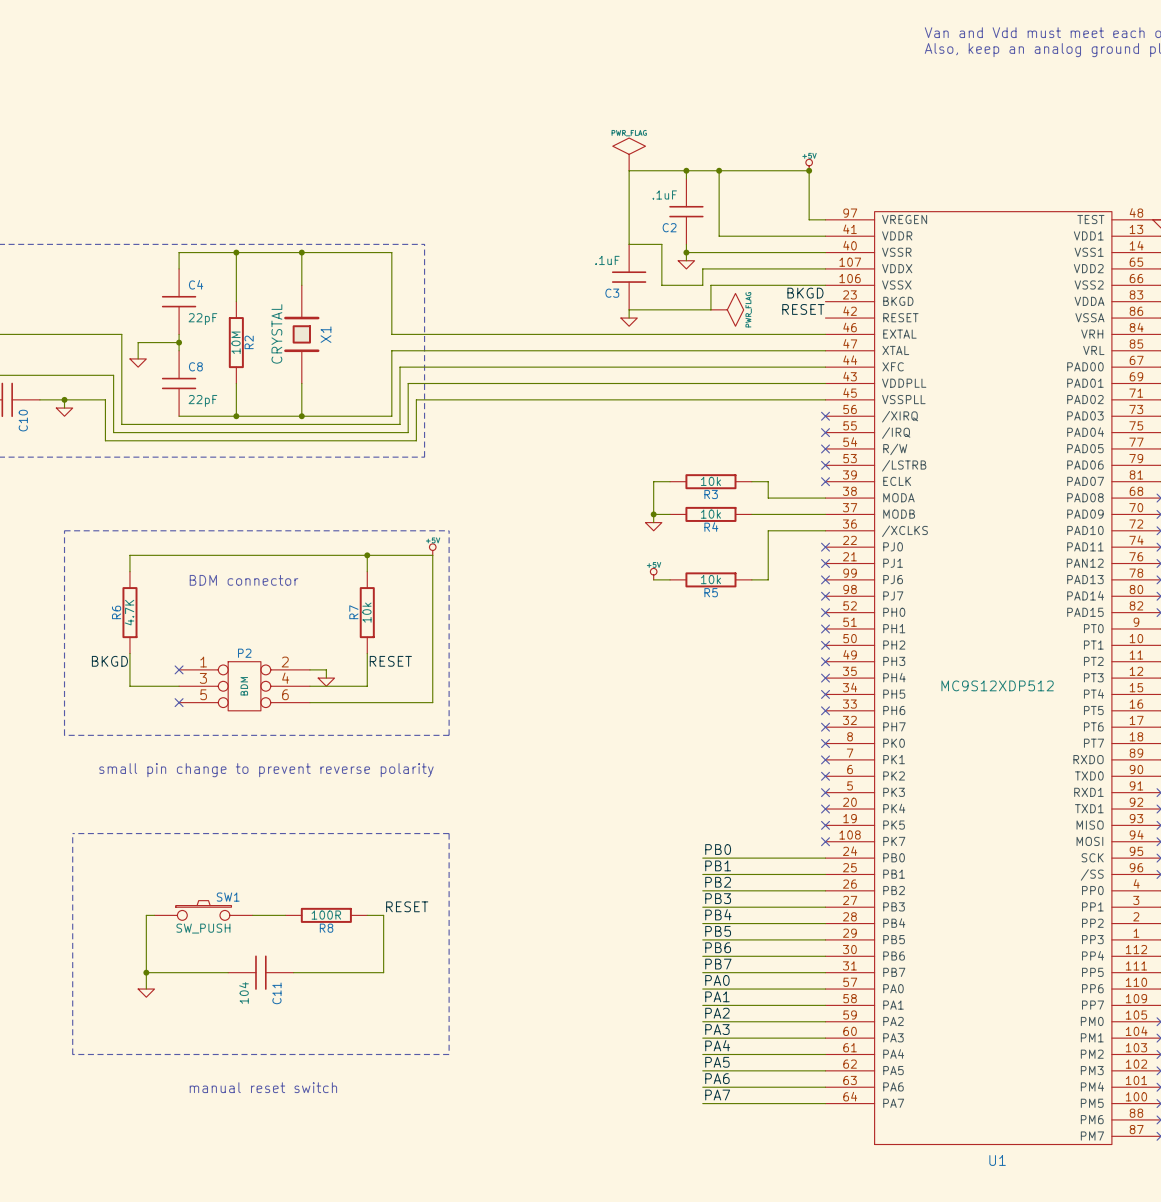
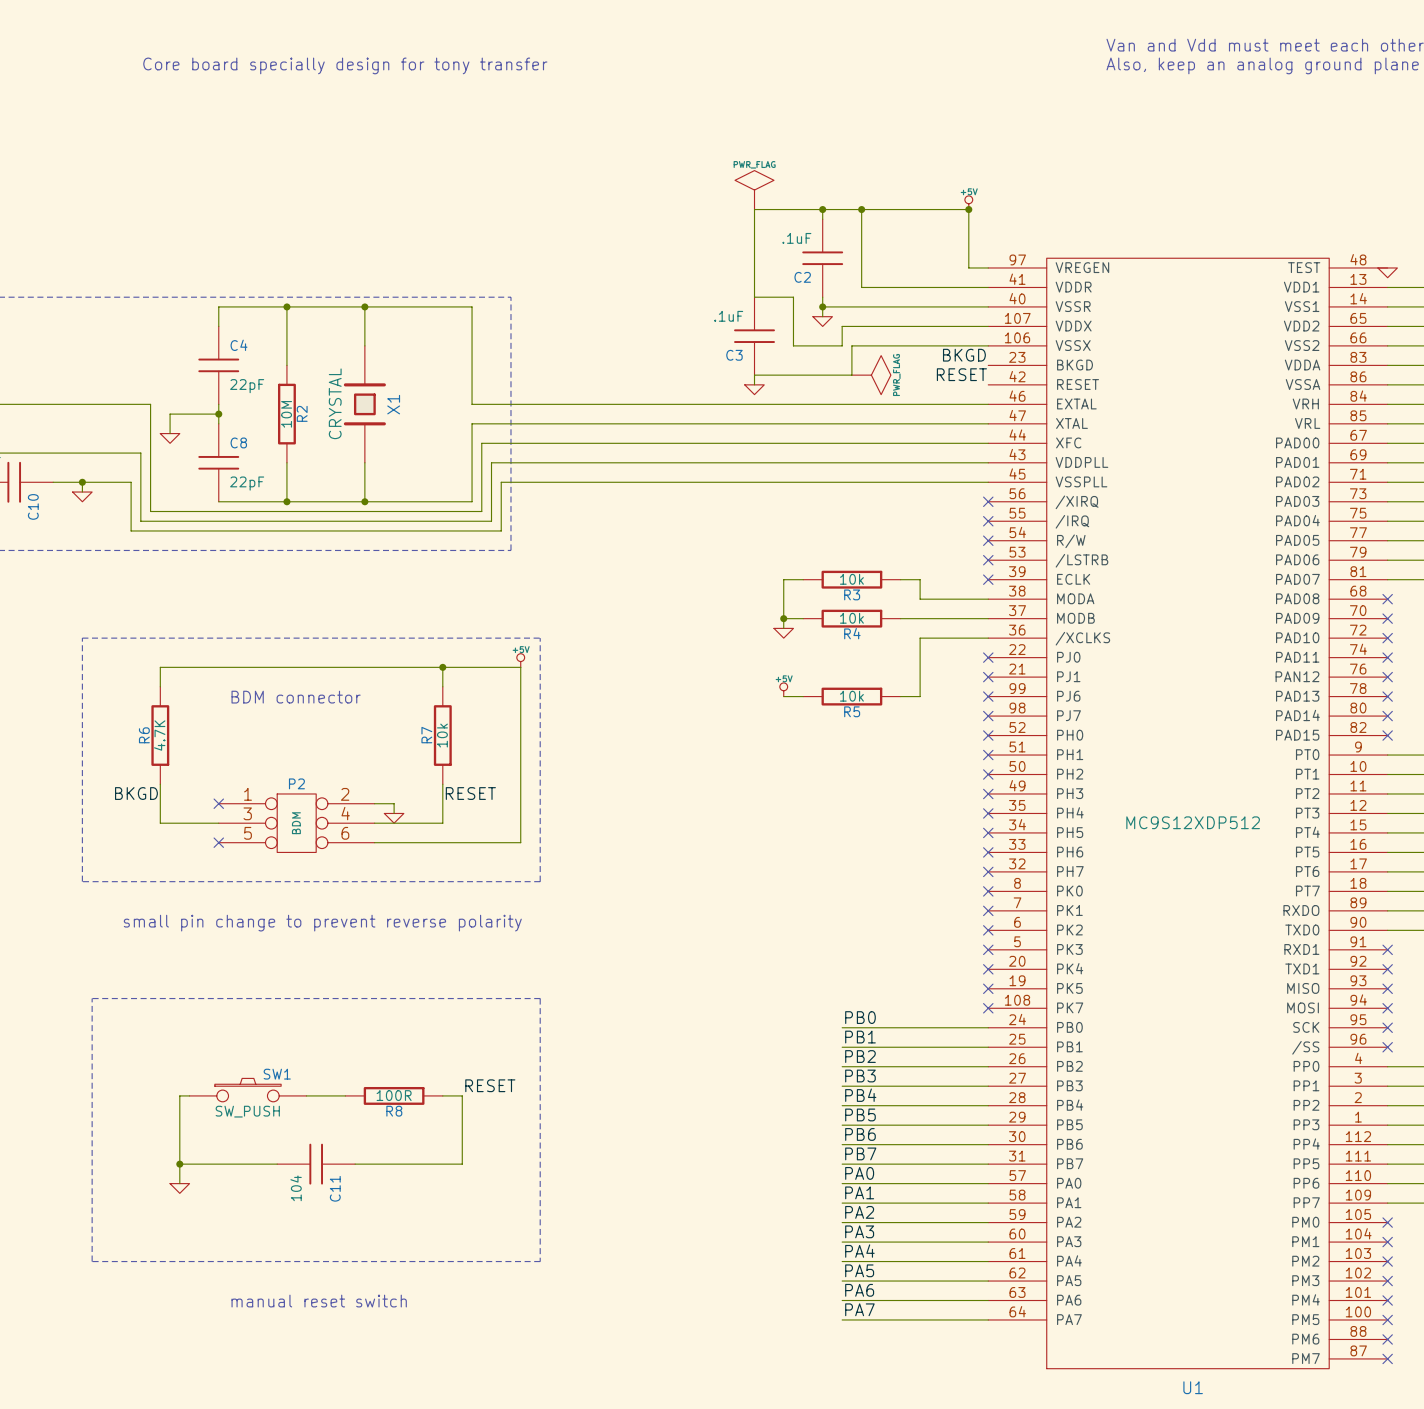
text: none -> Core board specially design for tony transfer (345, 65)

